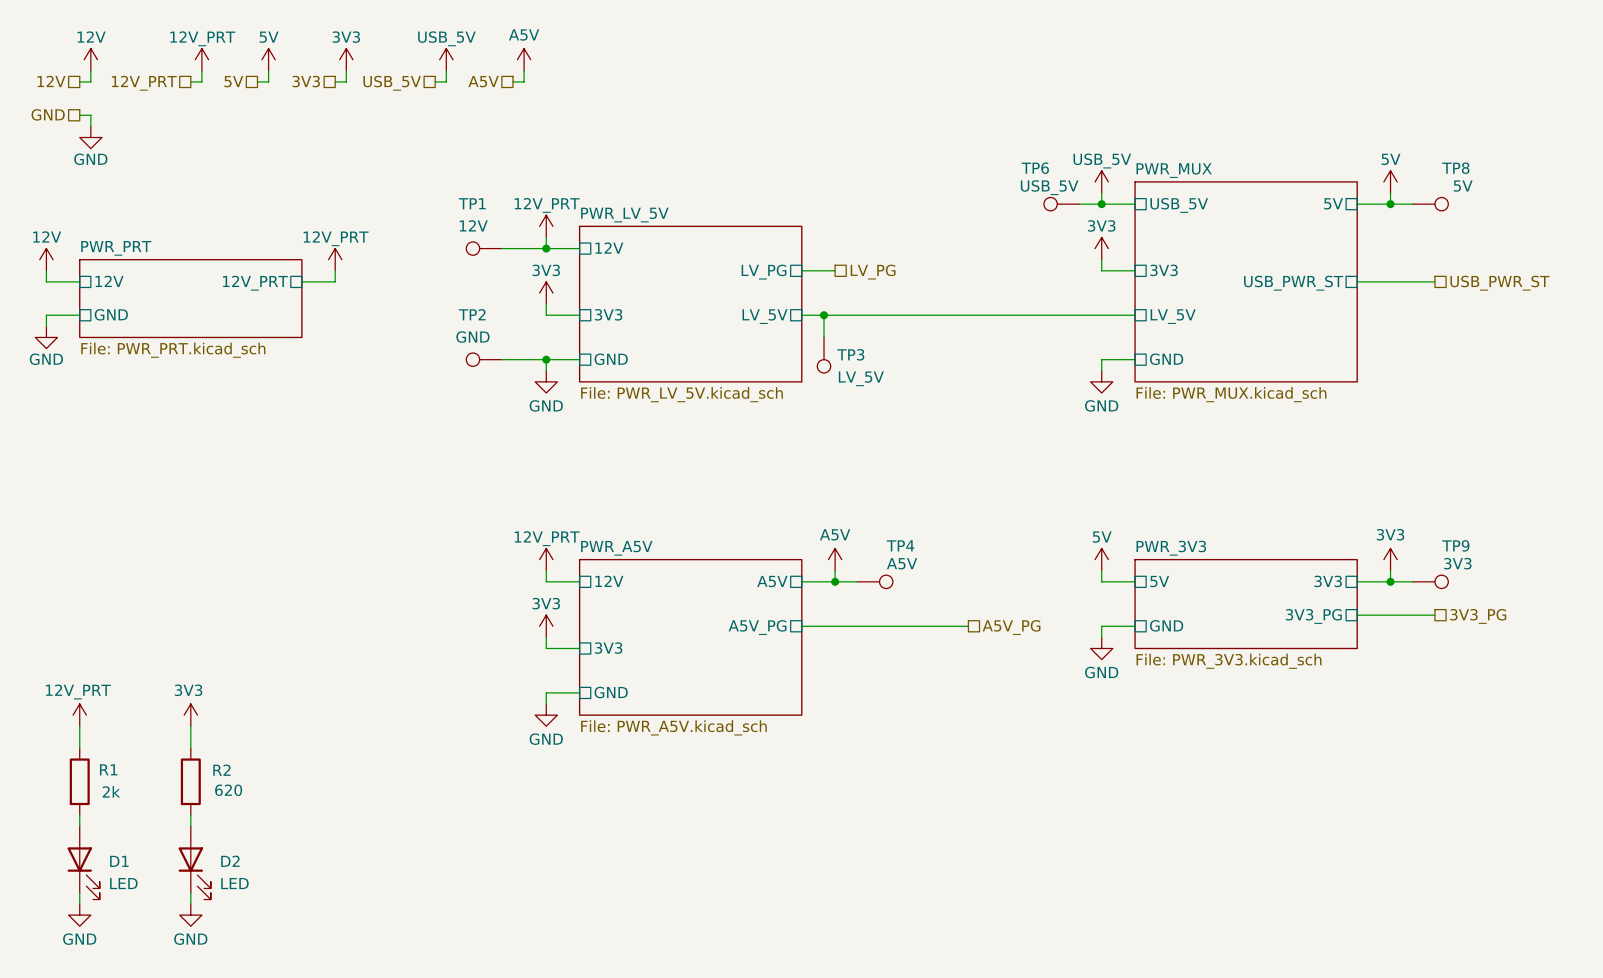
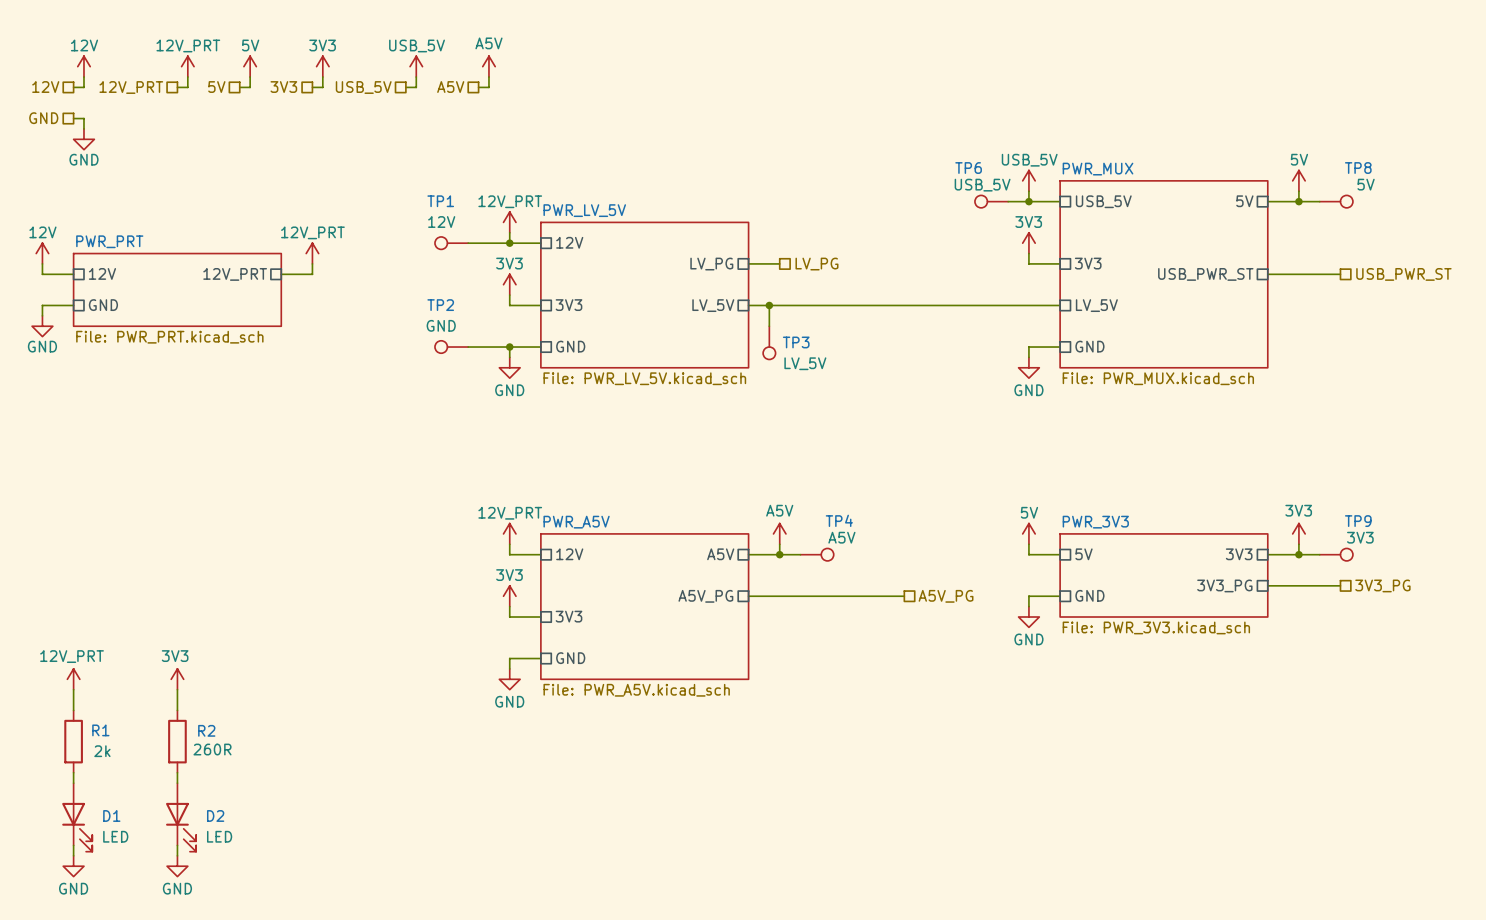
R2 value: 620 (228, 790) -> 260R (212, 749)

